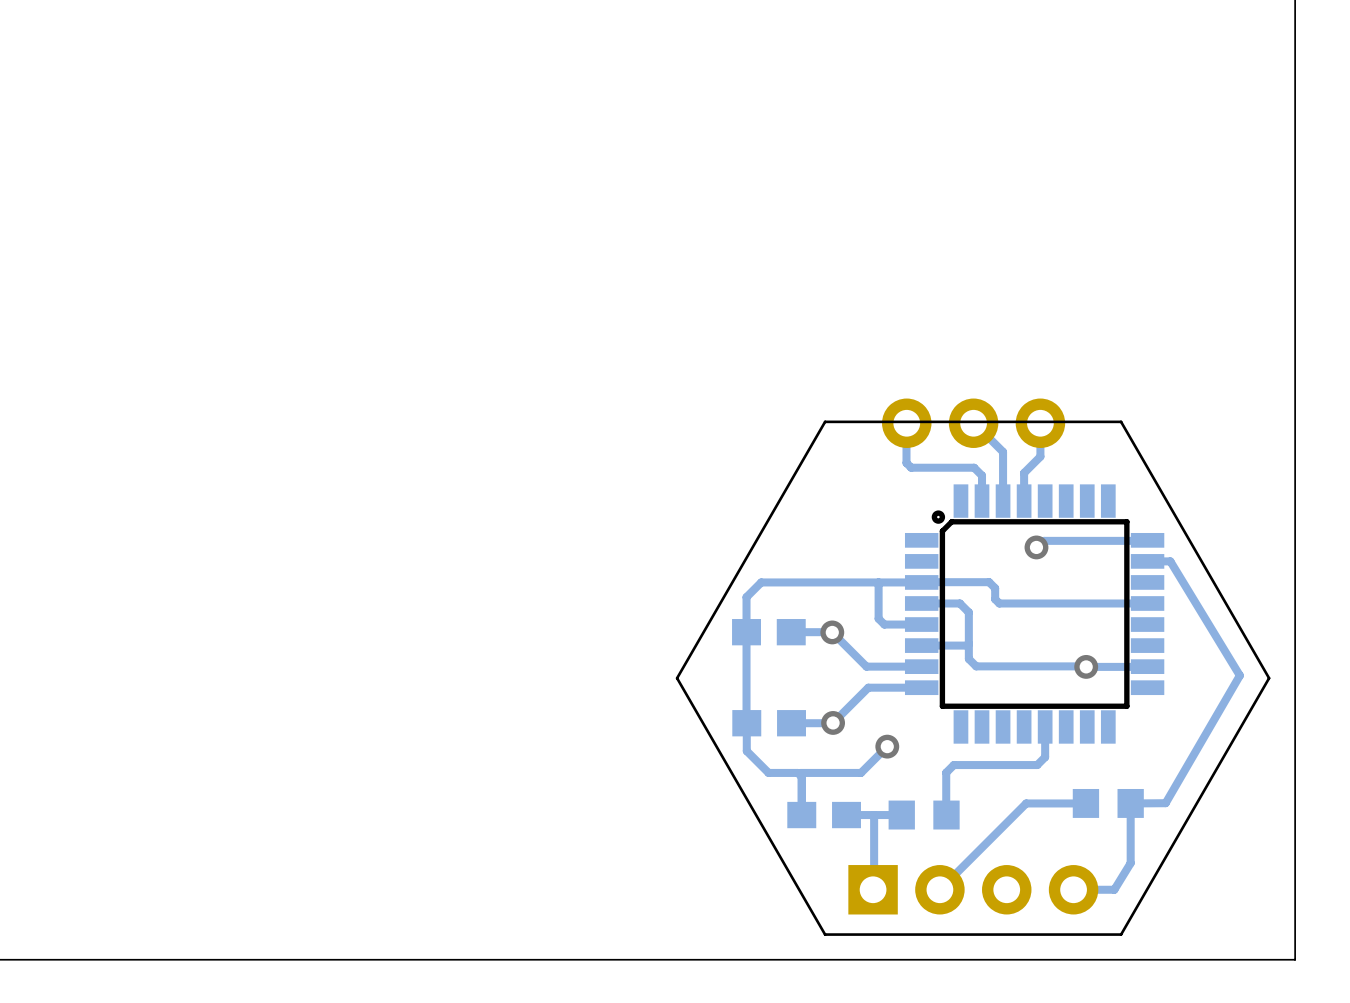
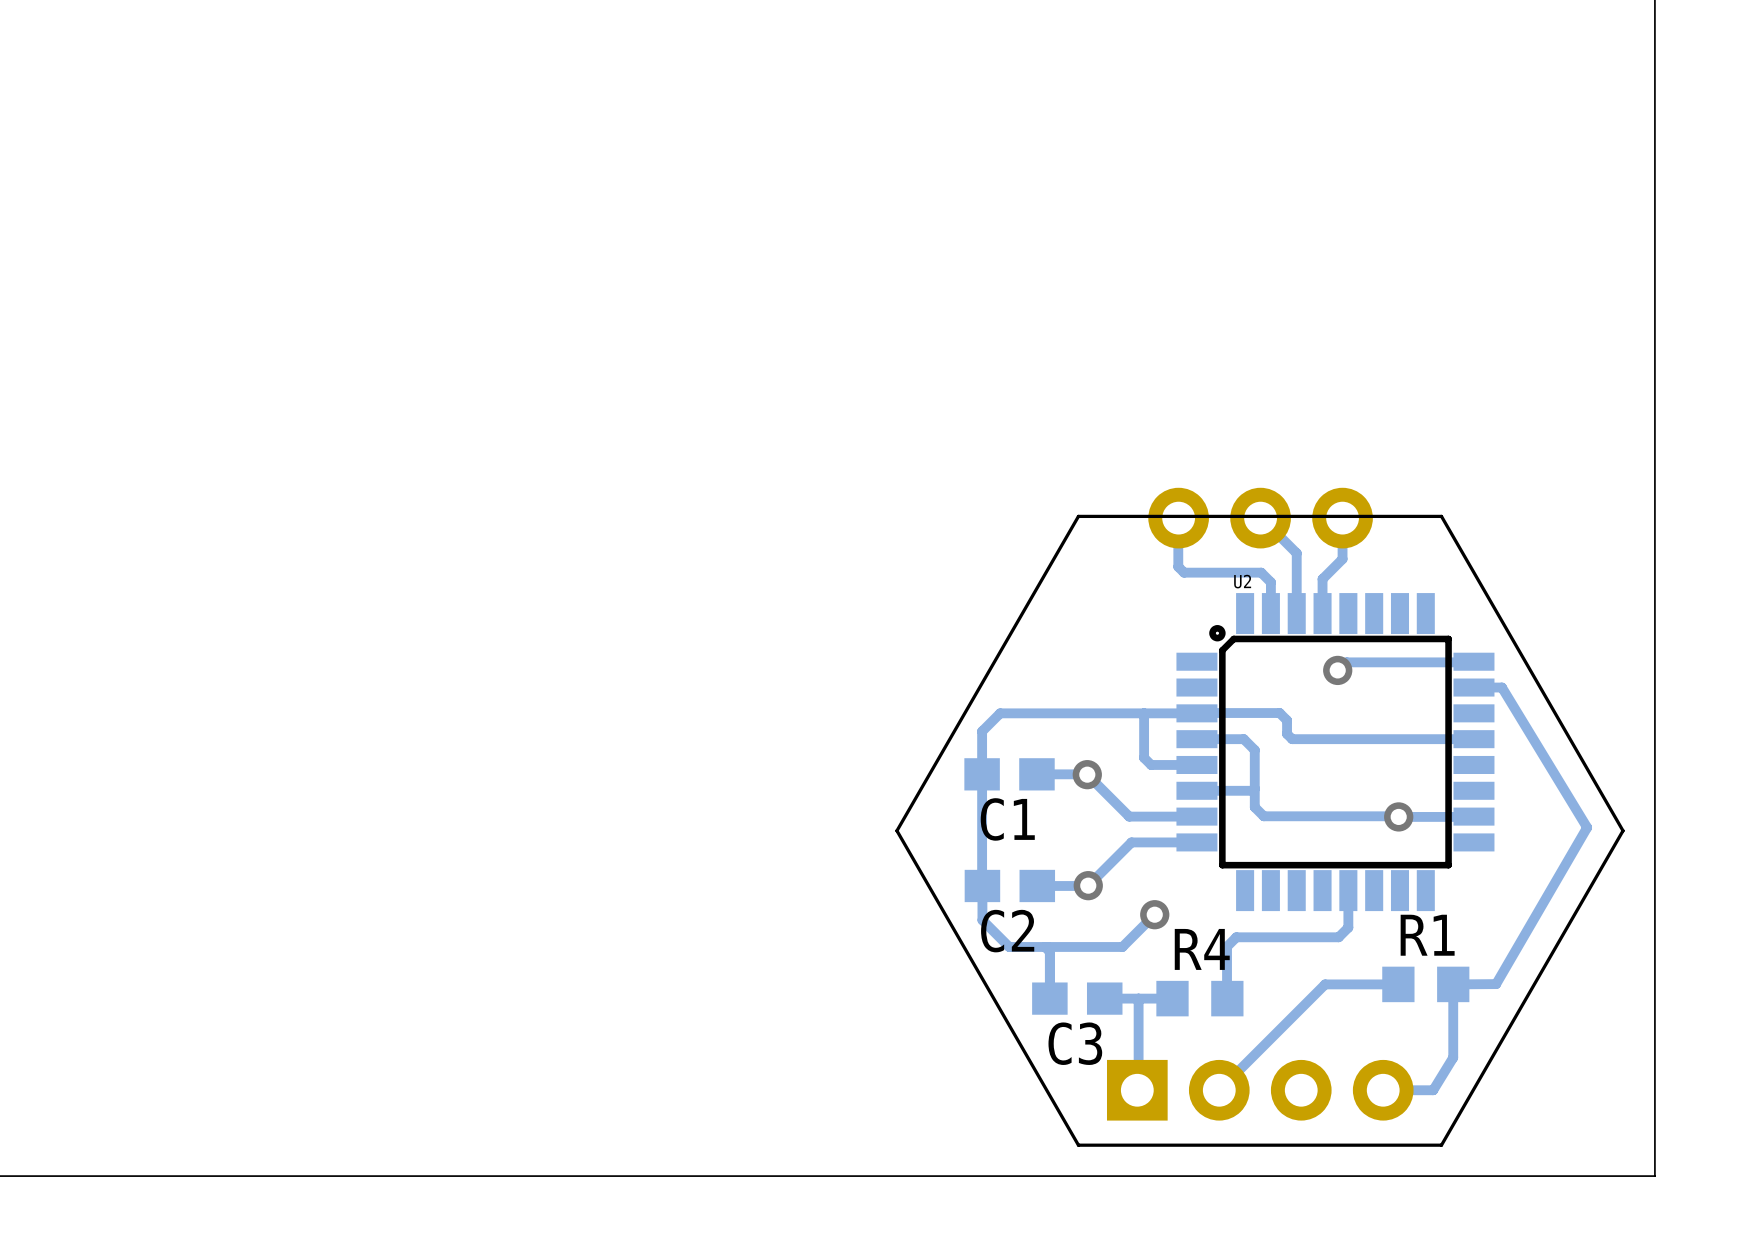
U2 name: none -> U2 (1242, 581)
C1 name: none -> C1 (1007, 819)
C2 name: none -> C2 (1007, 931)
R1 name: none -> R1 (1427, 935)
R4 name: none -> R4 (1202, 949)
C3 name: none -> C3 (1075, 1043)

